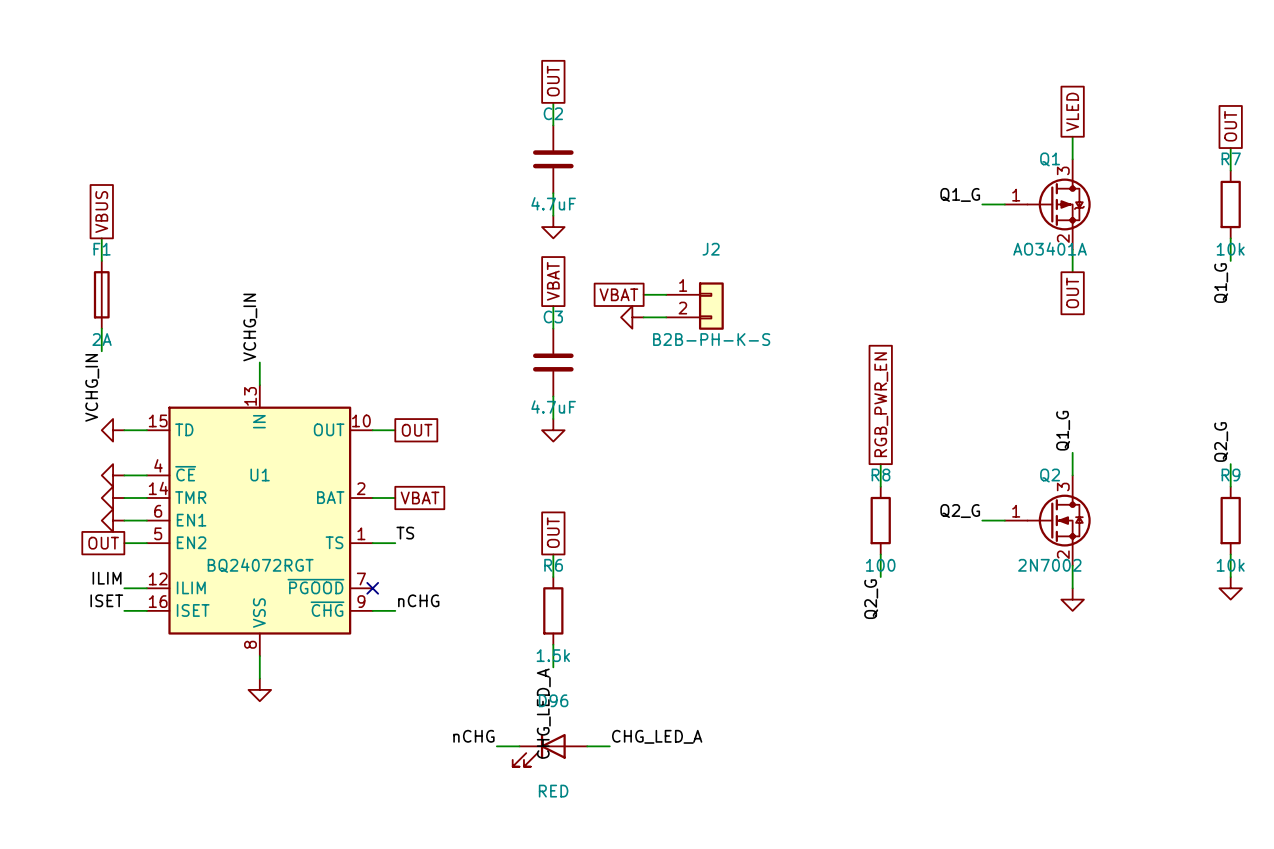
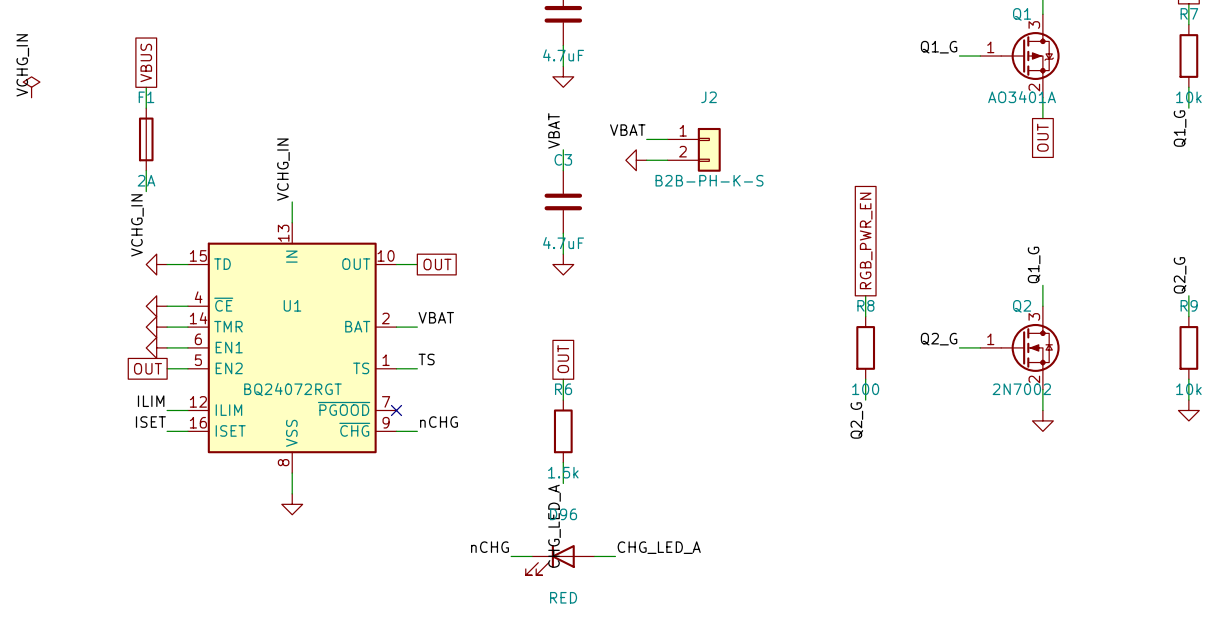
global label: VBAT (553, 281) -> none
label: none -> VBAT (627, 130)
label: none -> VBAT (554, 130)
global label: VBAT (618, 294) -> none
label: none -> VBAT (436, 317)
global label: VBAT (420, 498) -> none

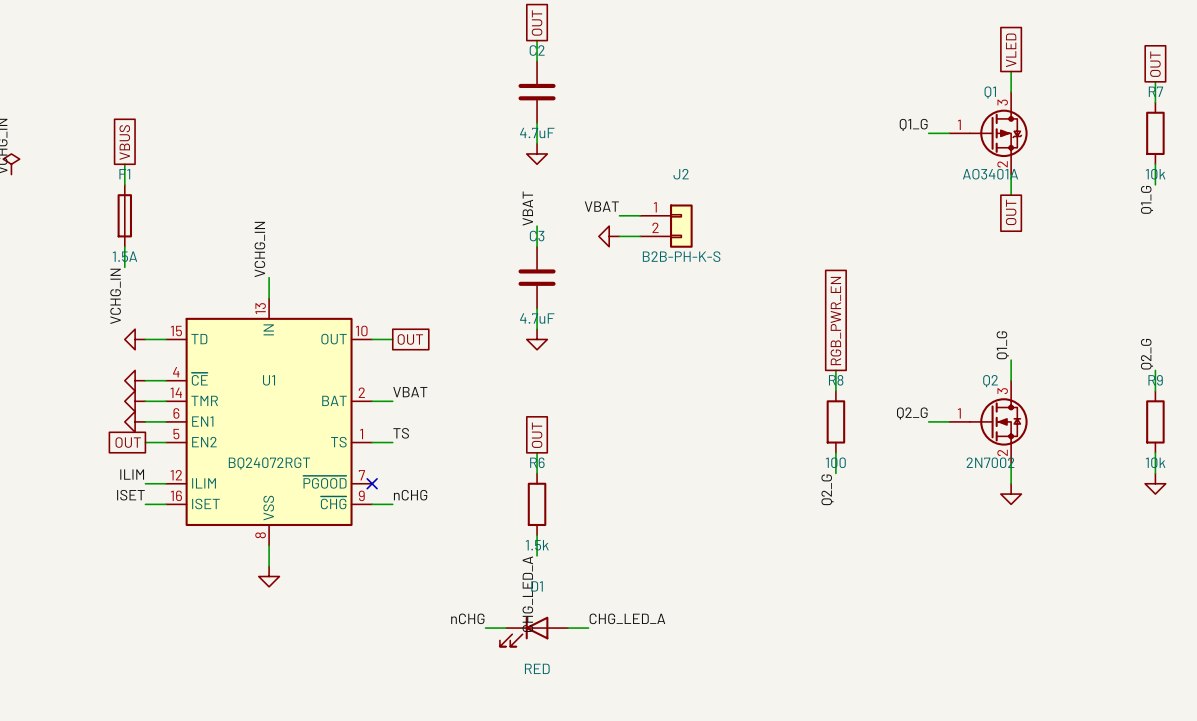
F1 value: 2A (146, 180) -> 1.5A (124, 256)
D96 name: D96 (563, 514) -> D1 (537, 586)

